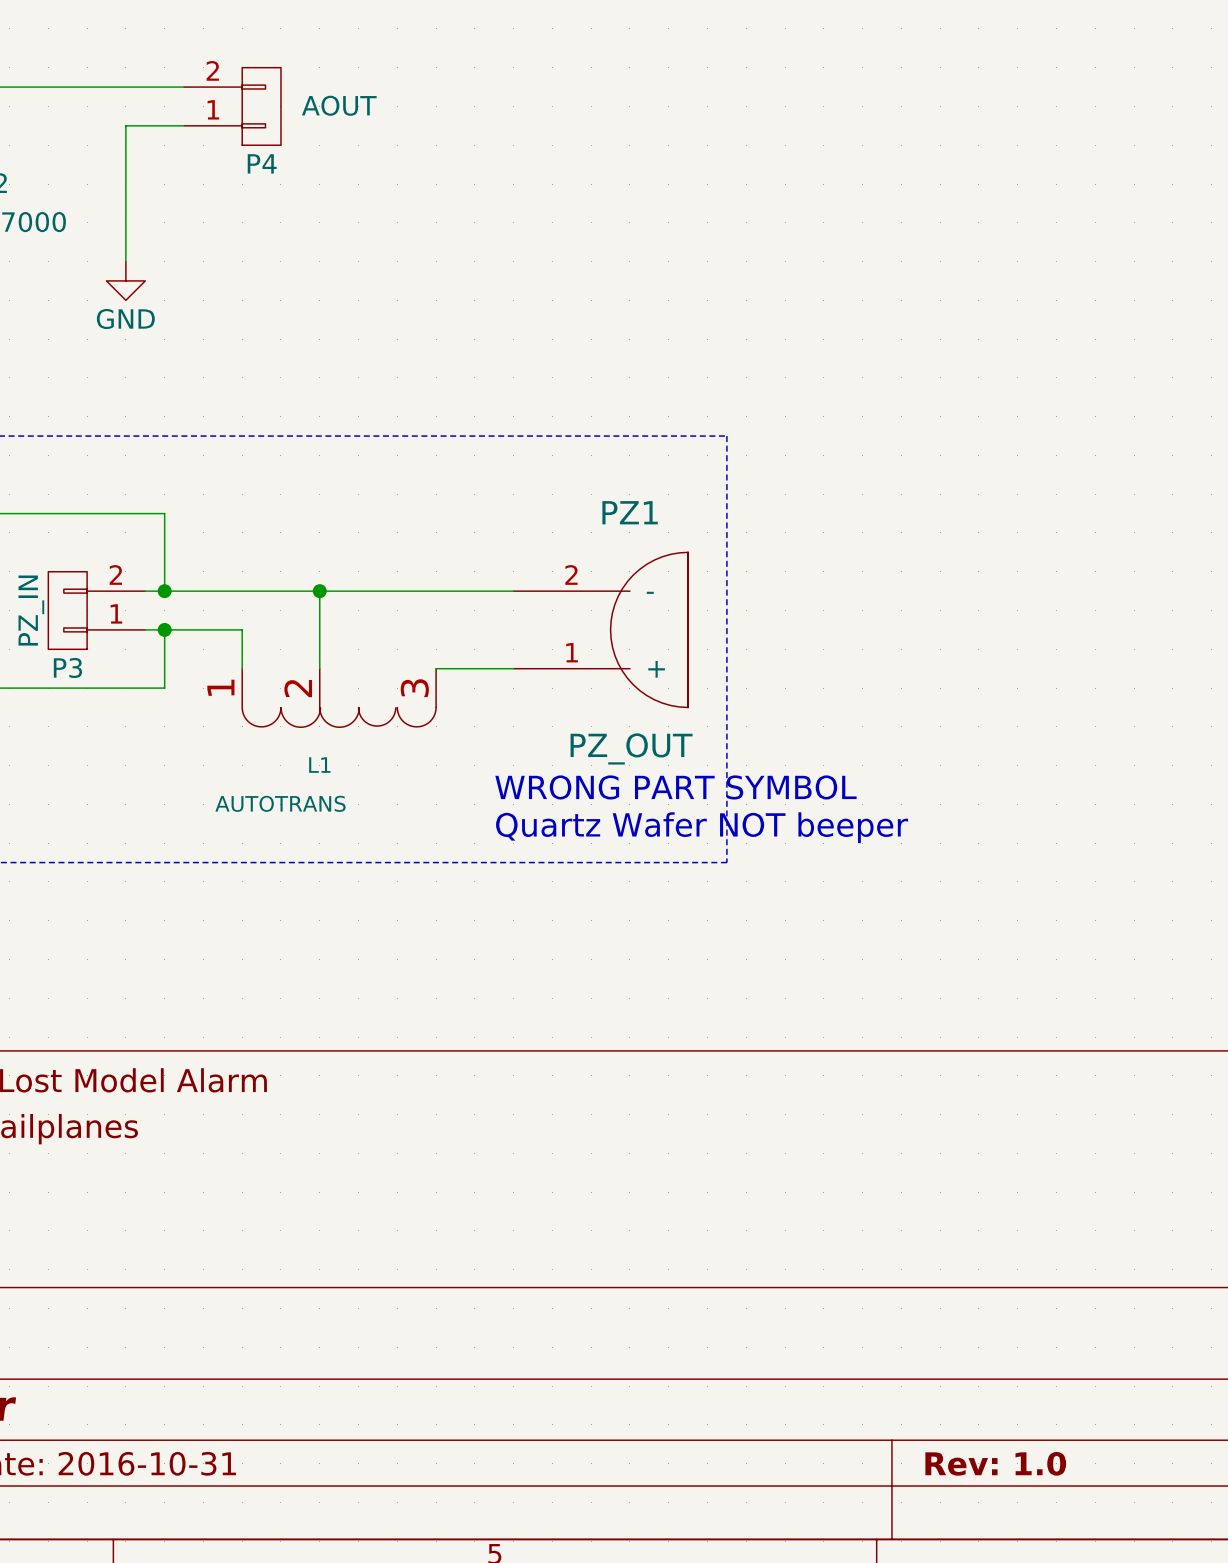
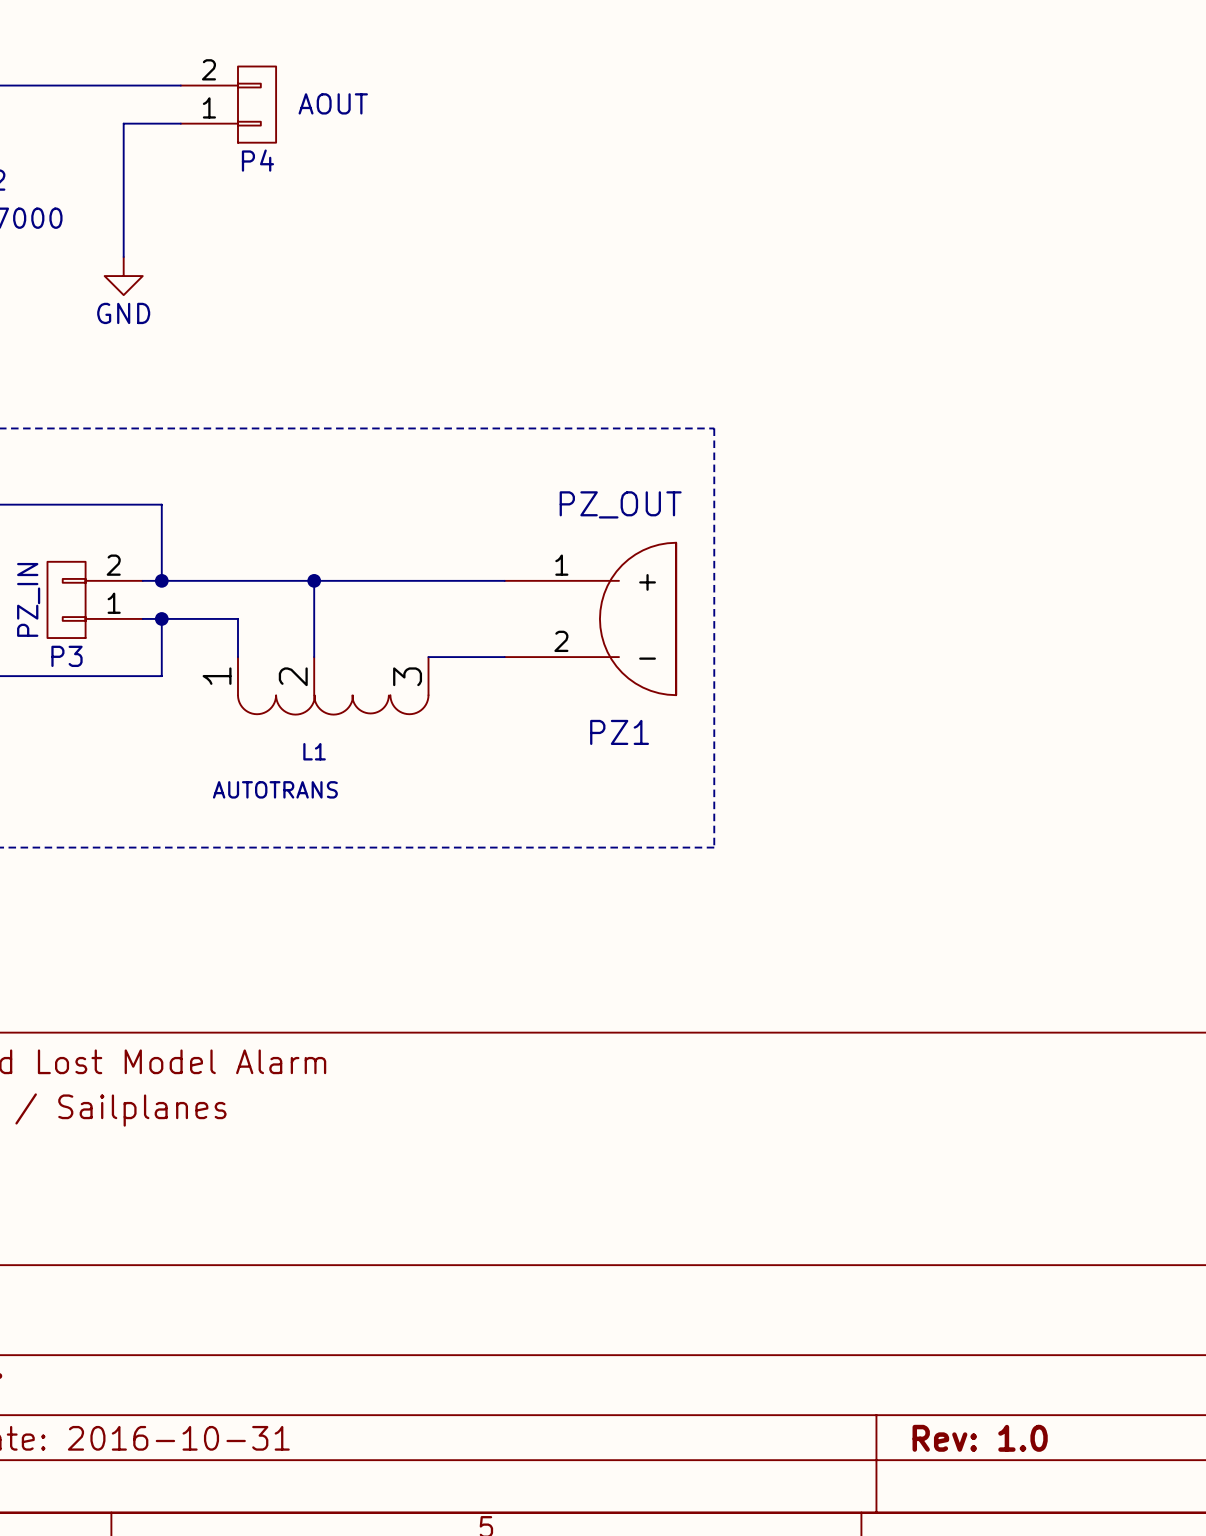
PZ1 flip: as is (649, 629) -> up-down (638, 618)
text: WRONG PART SYMBOL (675, 787) -> none
text: Quartz Wafer NOT beeper (702, 827) -> none

